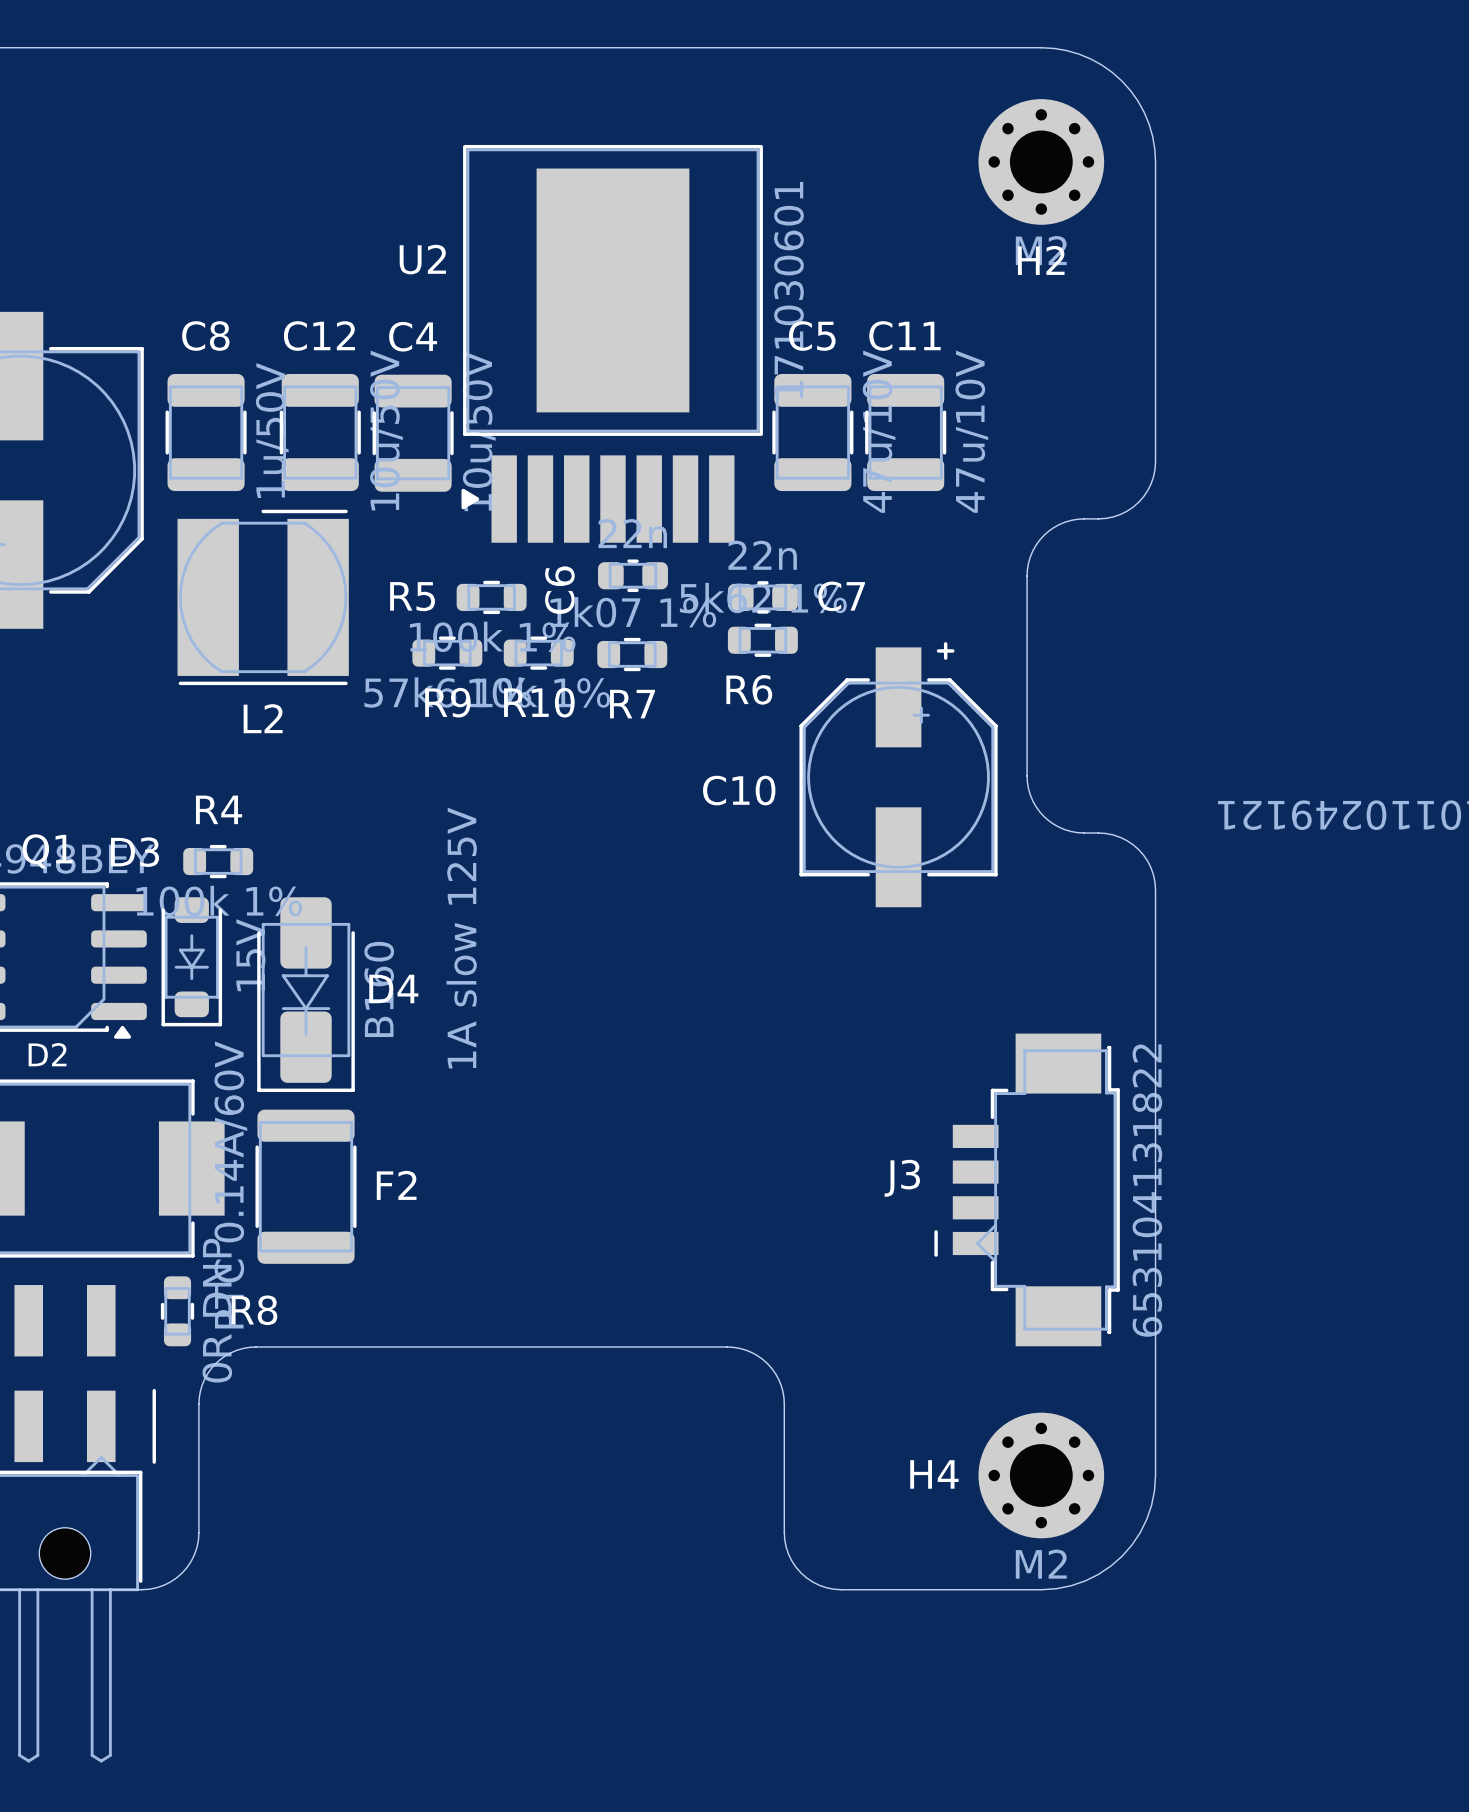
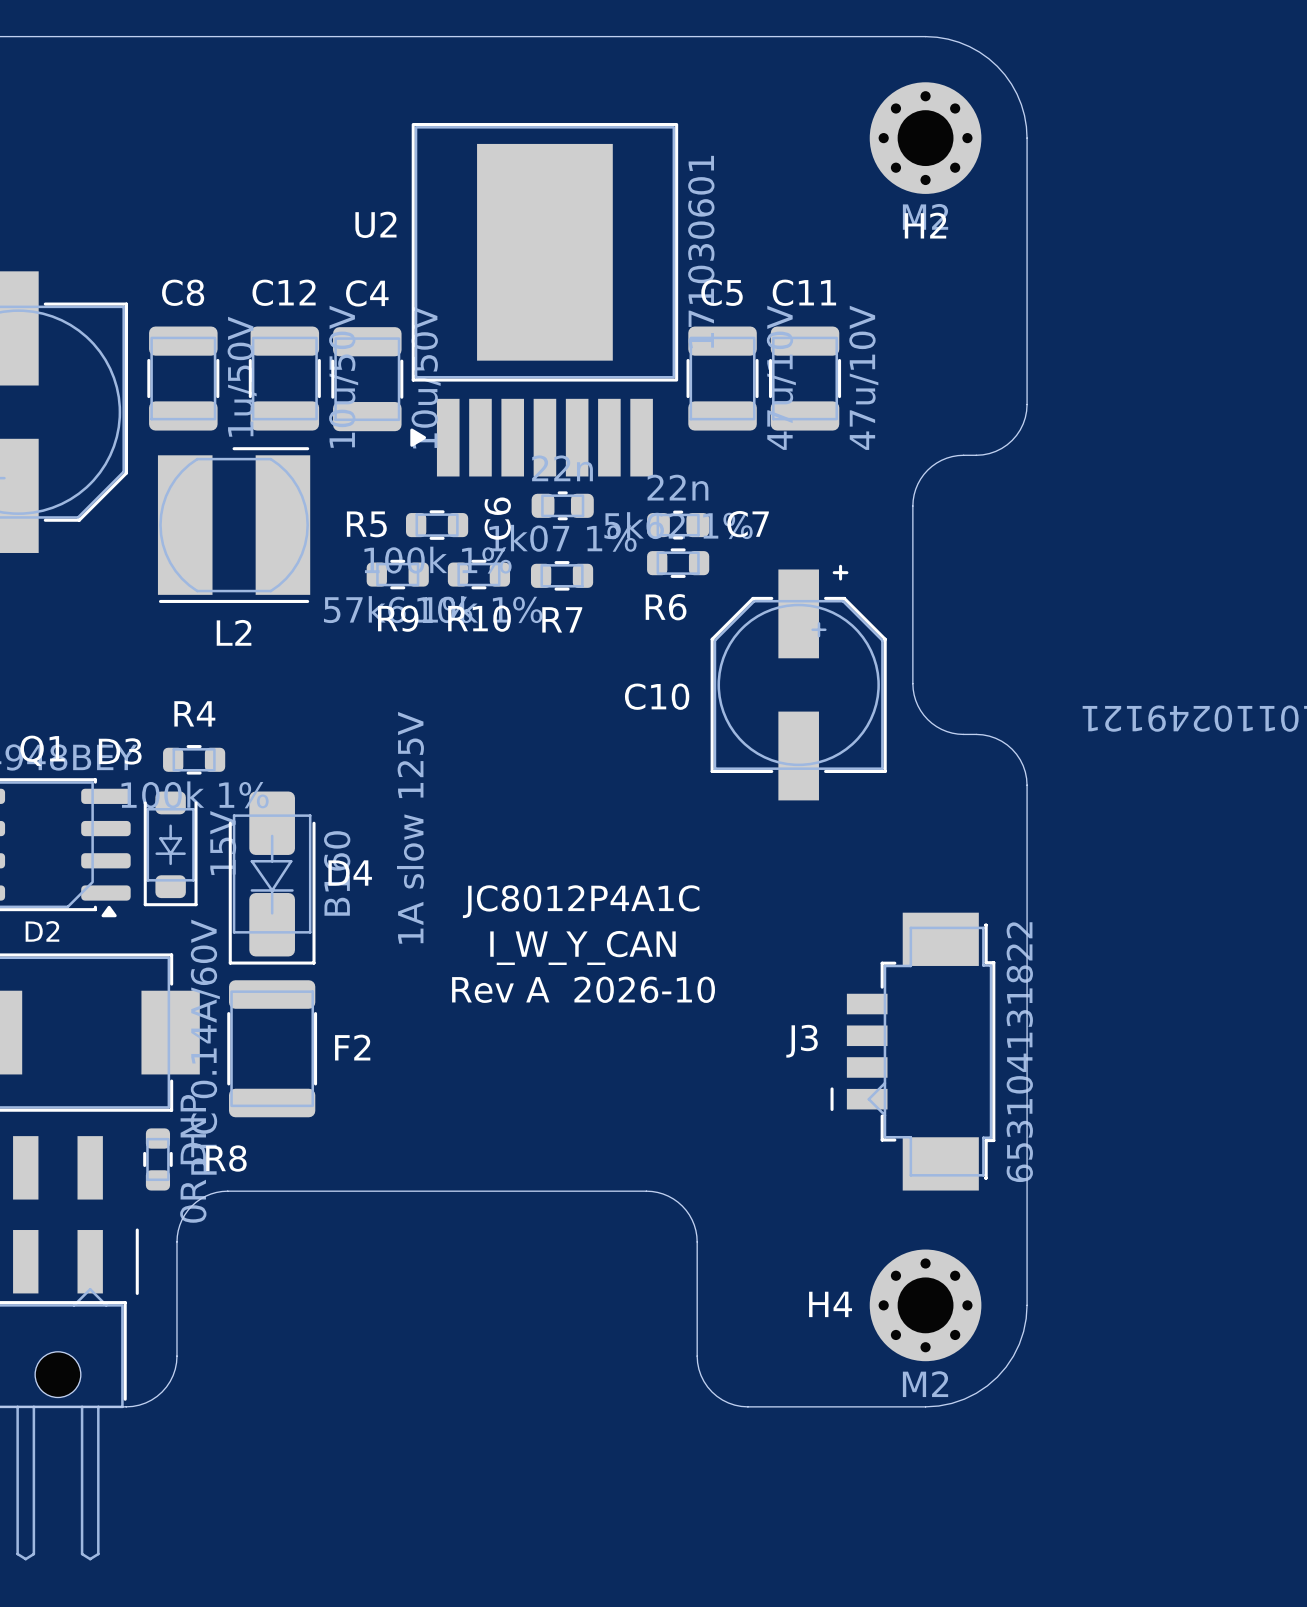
text: none -> JC8012P4A1C (581, 901)
text: none -> I_W_Y_CAN (582, 947)
text: none -> Rev A 2026-10 (583, 989)

